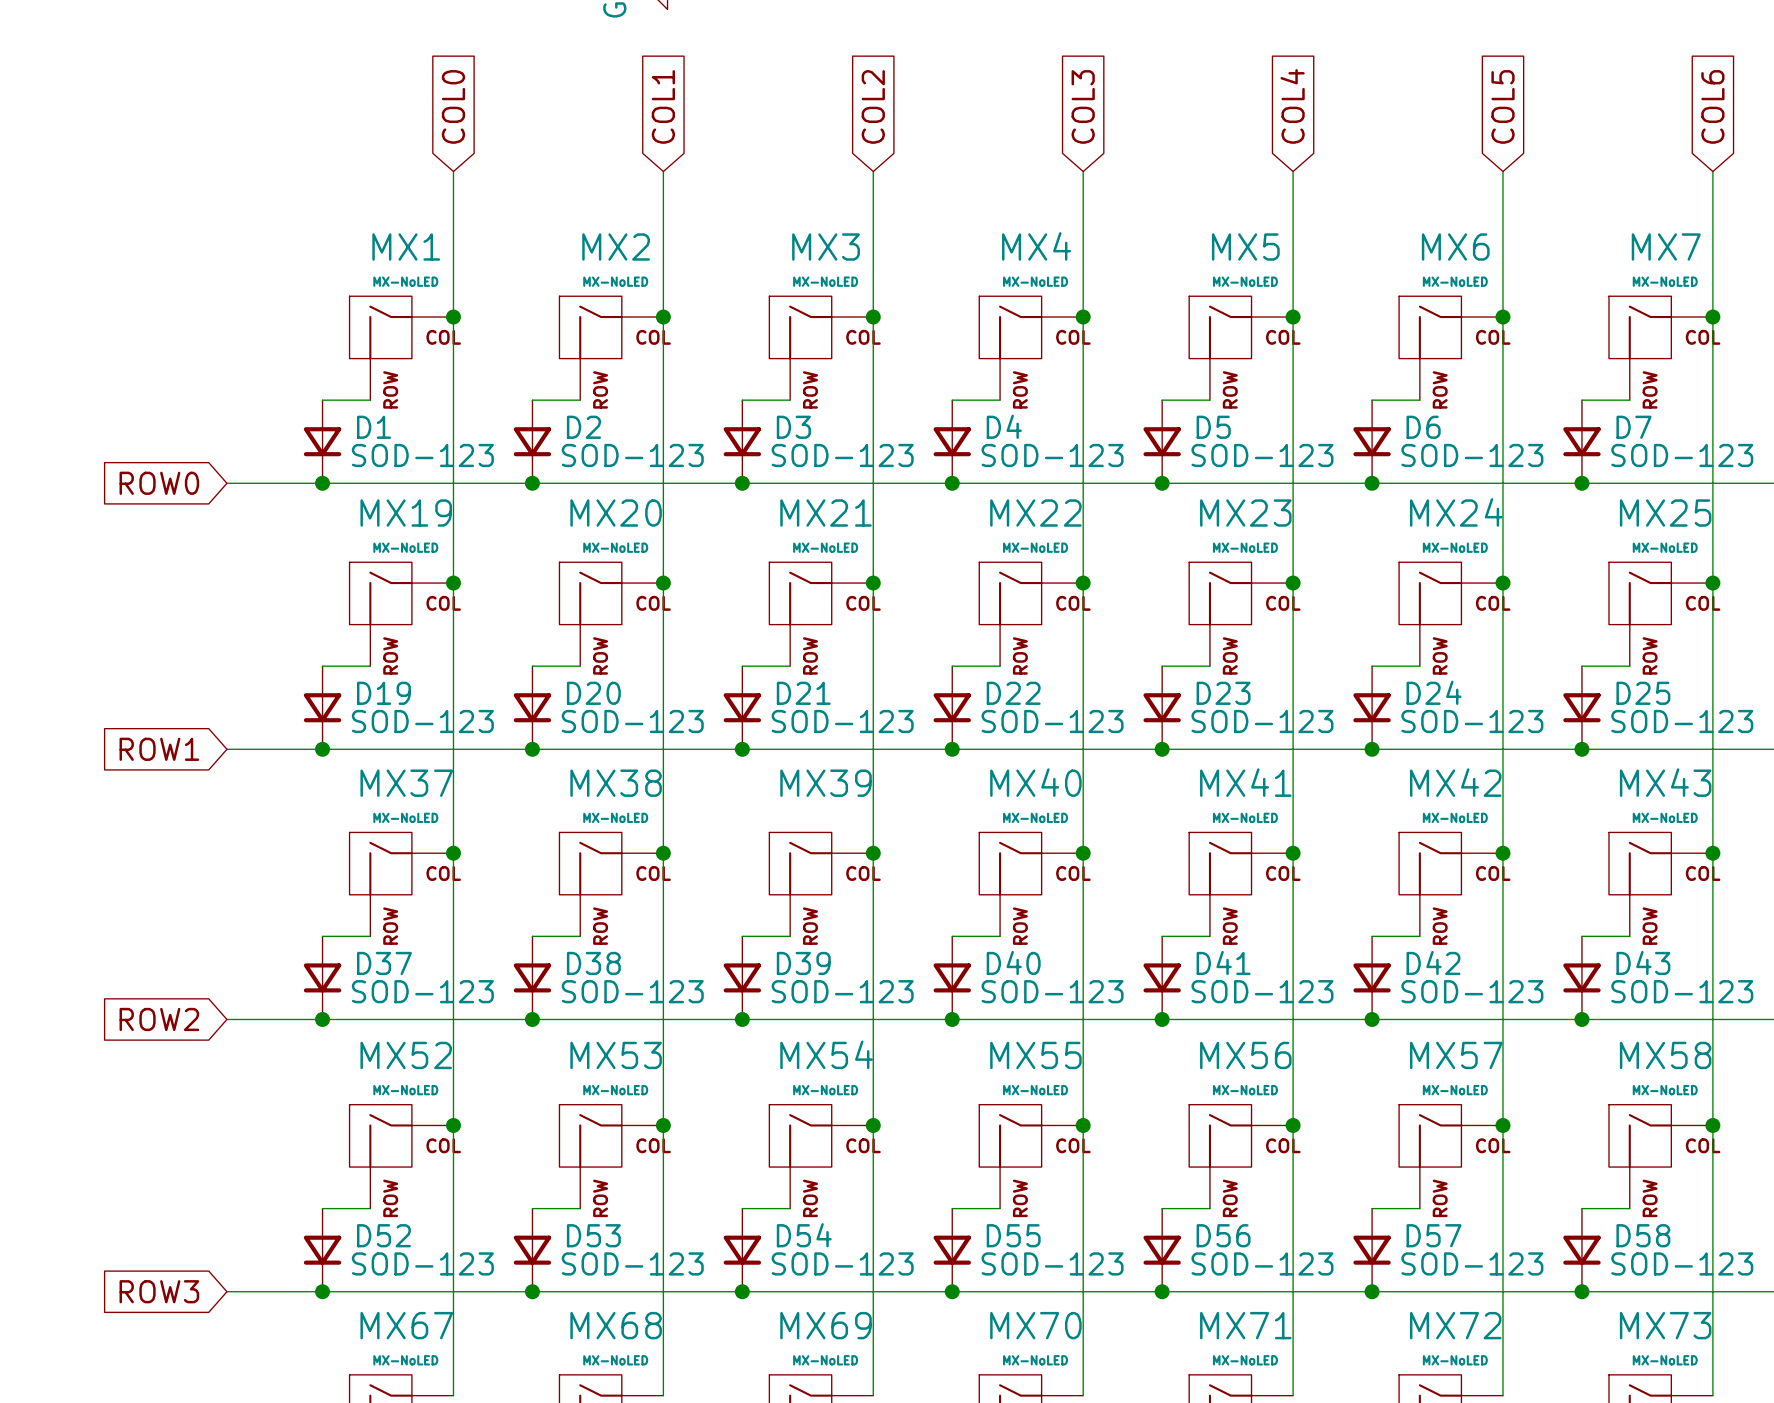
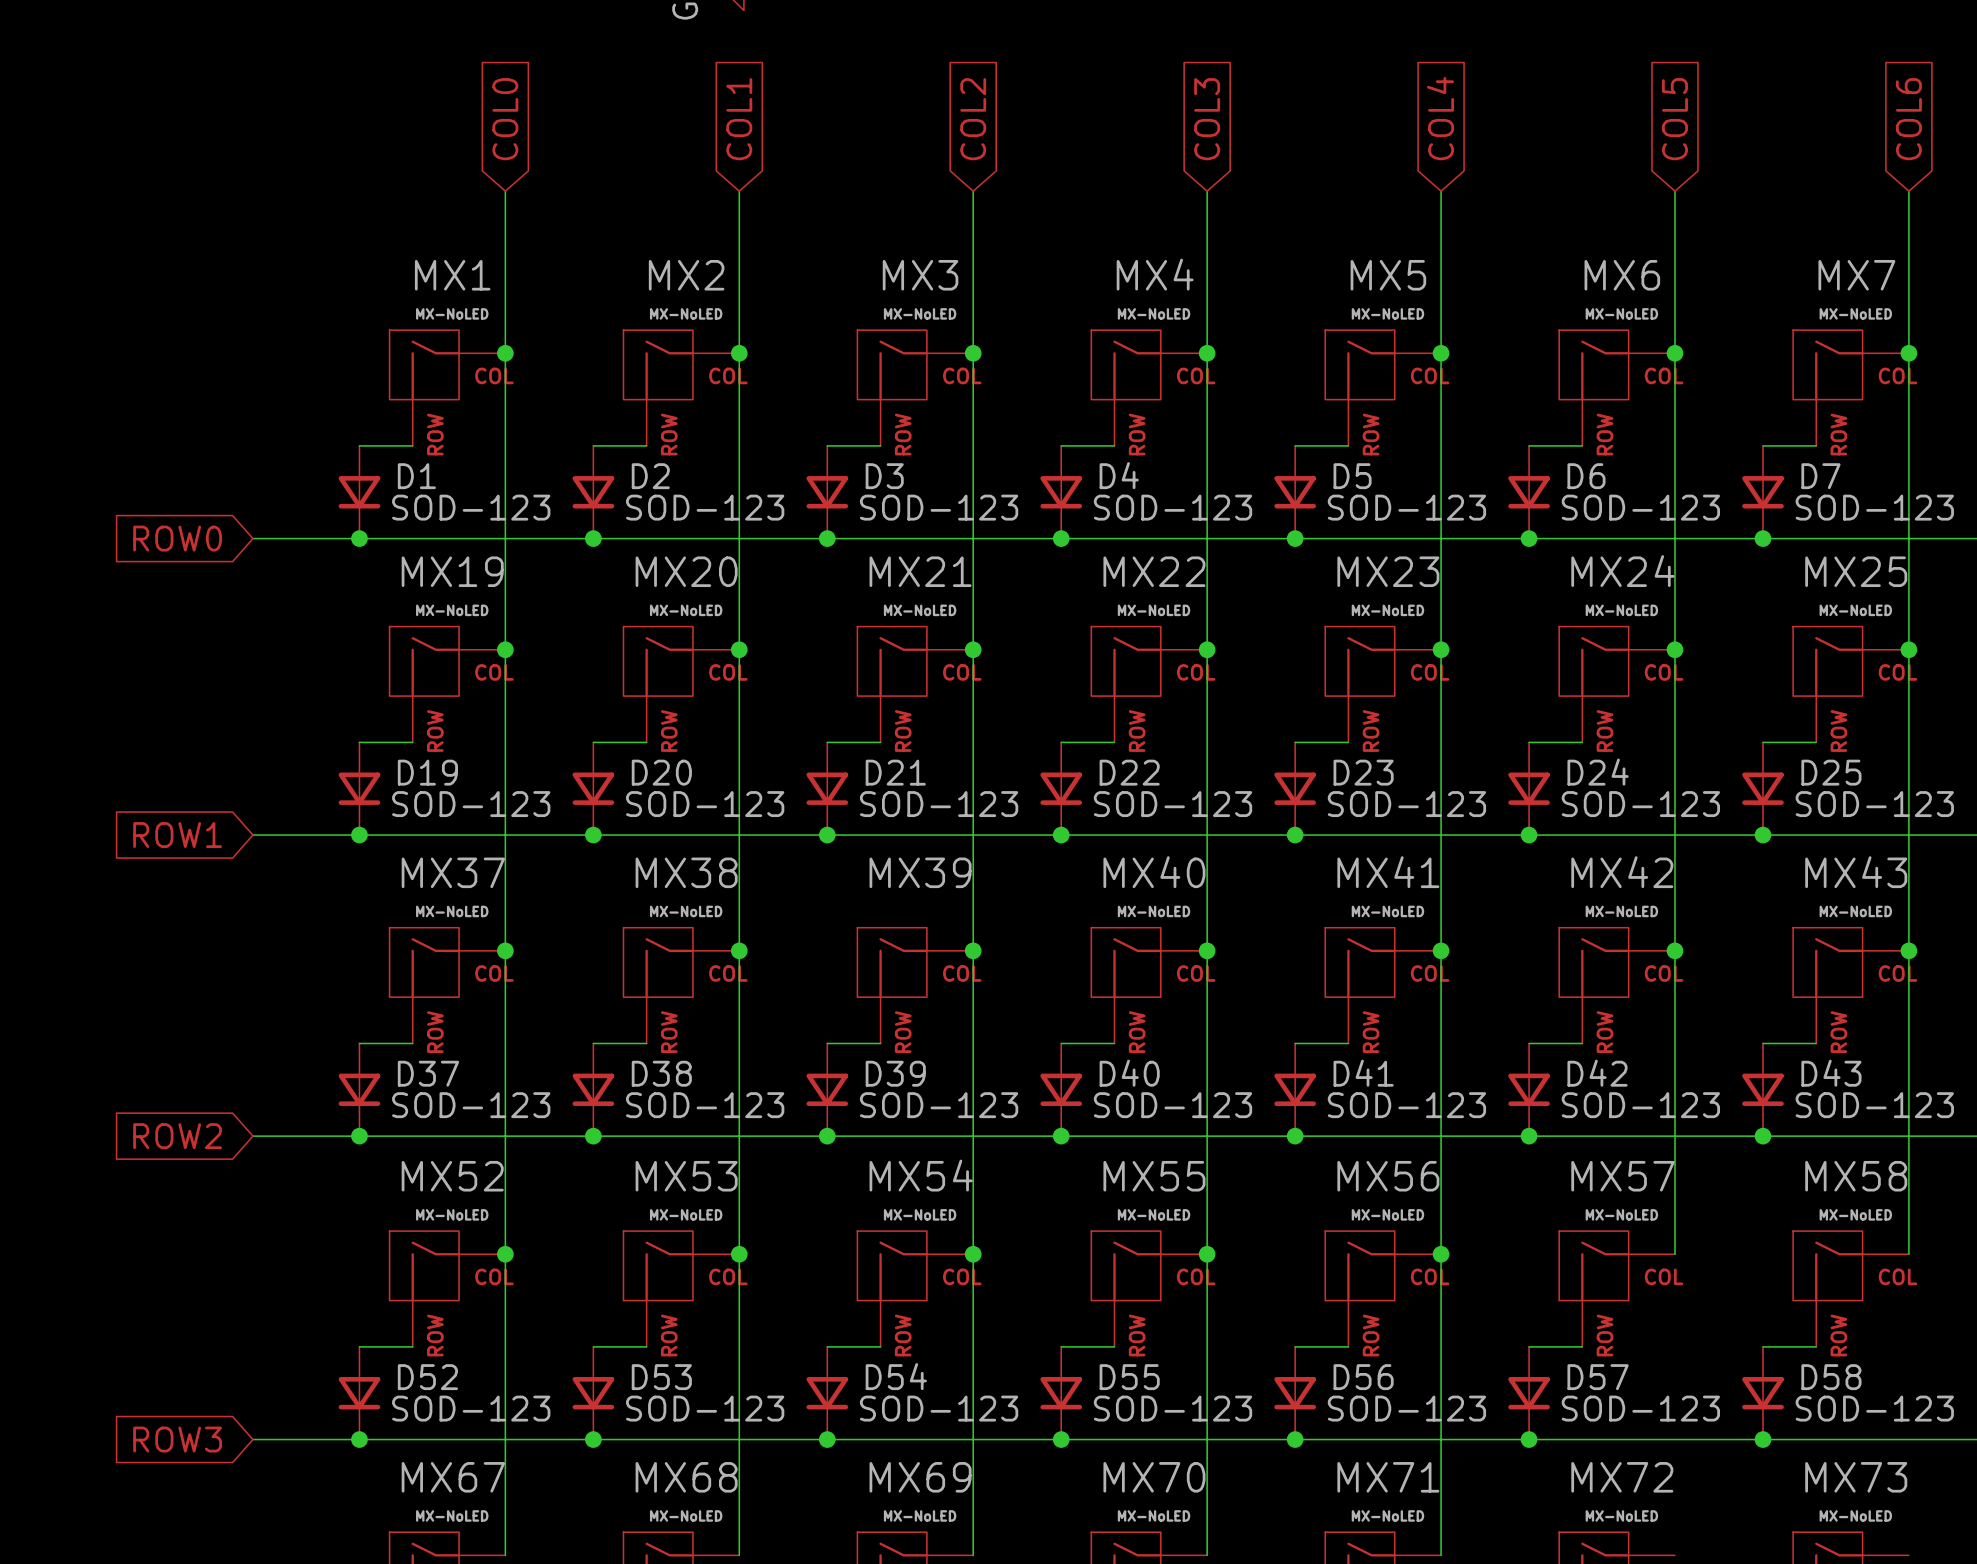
wire: (1503, 1125) (1503, 1395) -> none
junction: (1503, 1125) -> none
wire: (1712, 1125) (1712, 1395) -> none
junction: (1712, 1125) -> none

